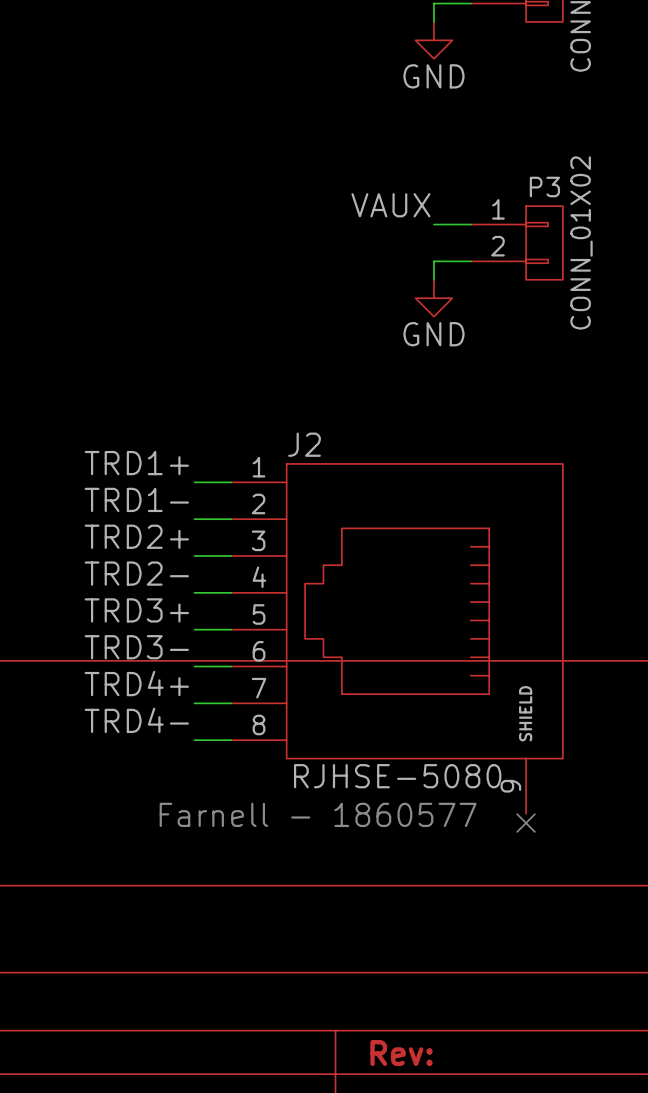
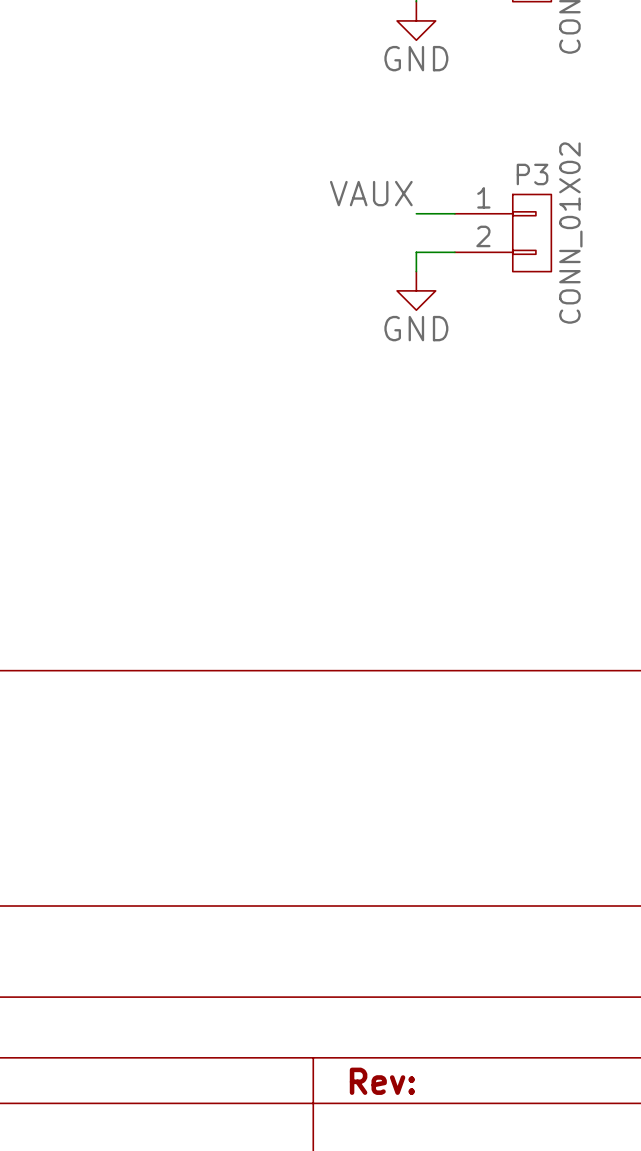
label: TRD1+ (136, 463) -> none
wire: (194, 482) (231, 482) -> none
label: TRD1- (136, 499) -> none
wire: (194, 519) (231, 519) -> none
label: TRD2+ (136, 536) -> none
wire: (194, 556) (231, 556) -> none
label: TRD2- (136, 573) -> none
wire: (194, 592) (231, 592) -> none
label: TRD3+ (136, 610) -> none
wire: (194, 629) (231, 629) -> none
J2: RJHSE-5080 (397, 638) -> none
label: TRD3- (136, 647) -> none
wire: (194, 666) (231, 666) -> none
label: TRD4+ (136, 683) -> none
wire: (194, 703) (231, 703) -> none
label: TRD4- (136, 720) -> none
wire: (194, 740) (231, 740) -> none
text: Farnell - 1860577 (318, 814) -> none
no-connect mark: (526, 823) -> none

